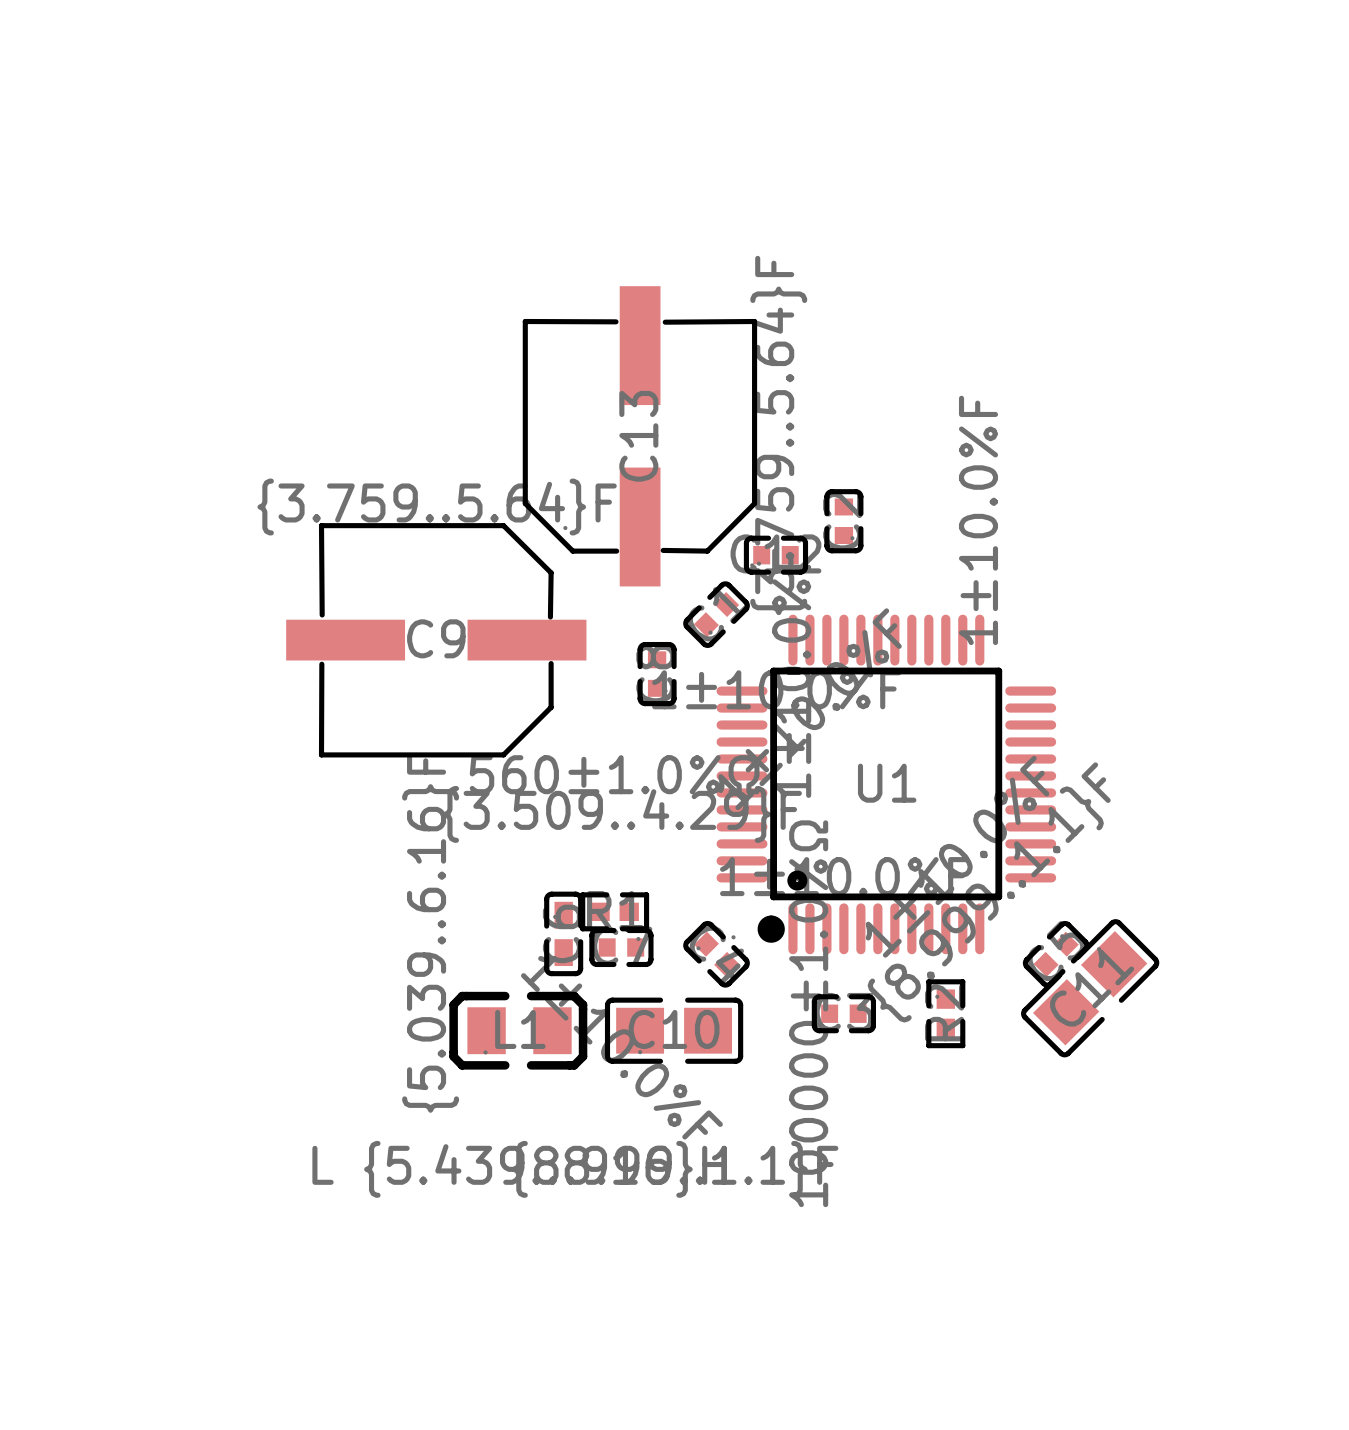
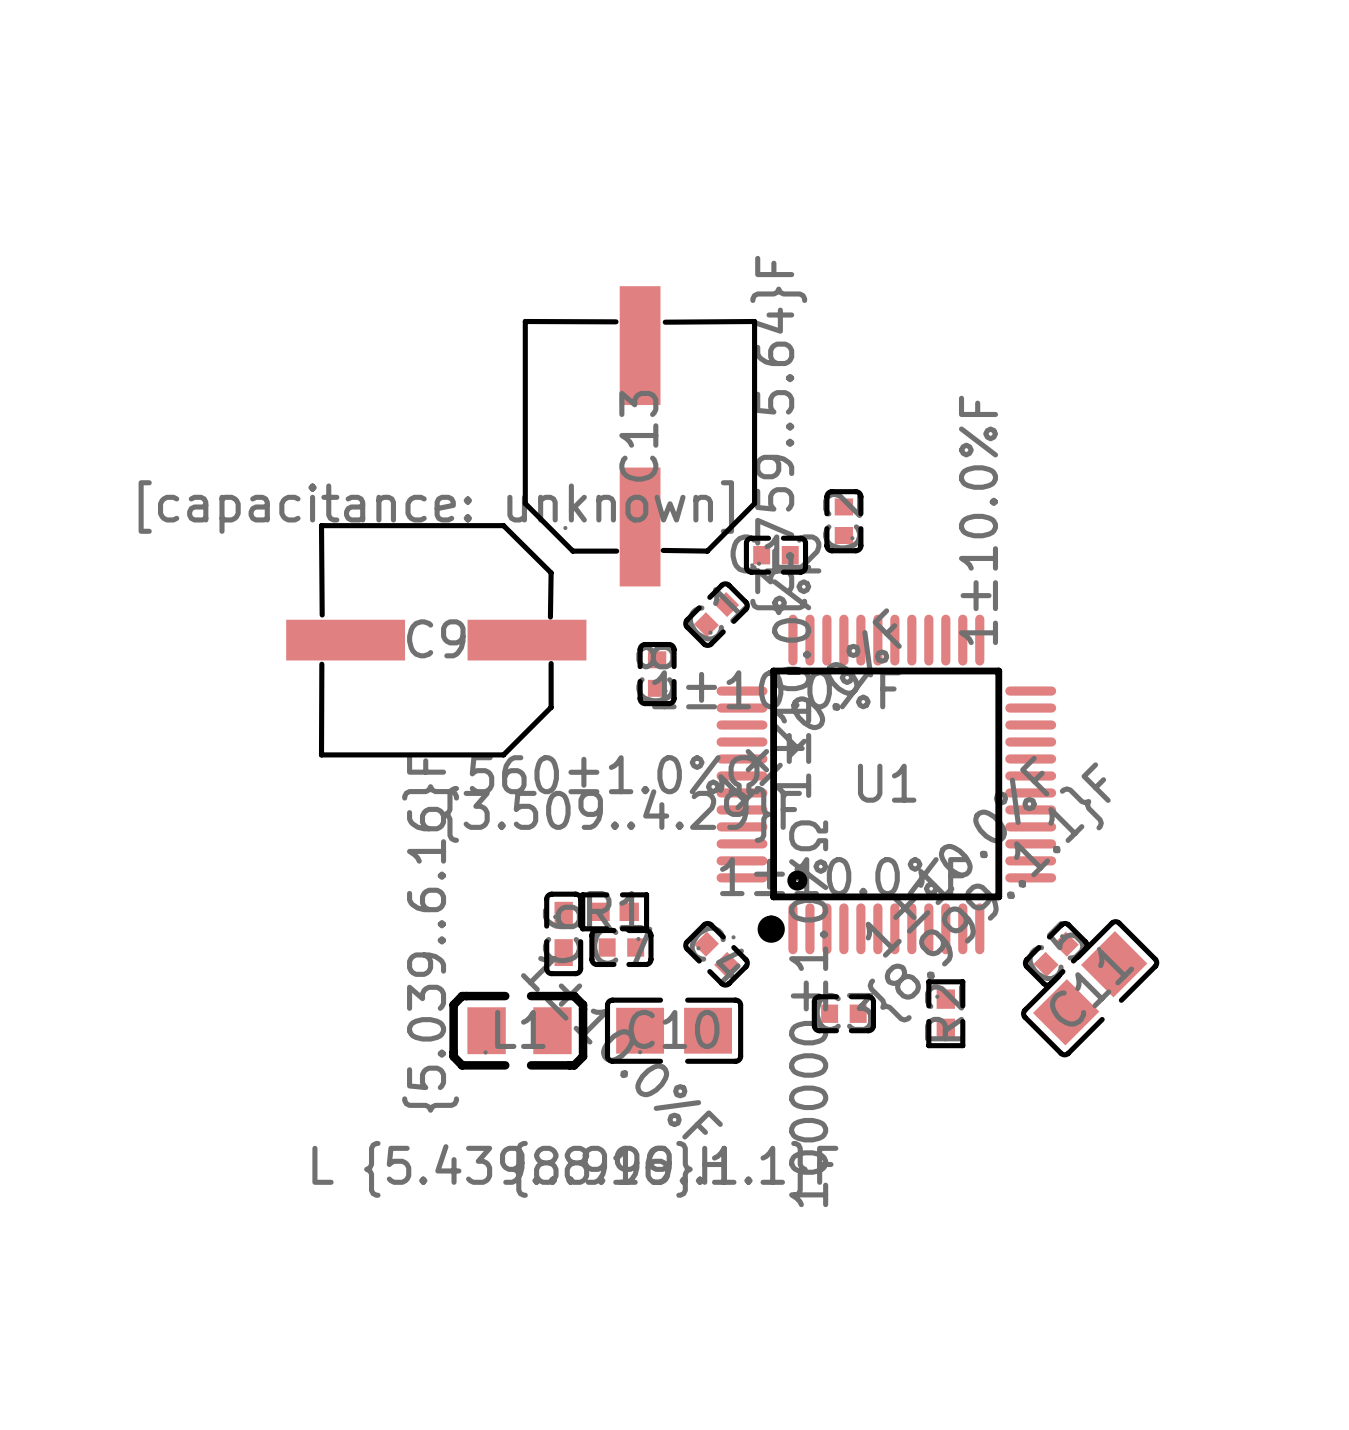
C9 value: {3.759..5.64}F (437, 507) -> [capacitance: unknown] (436, 507)

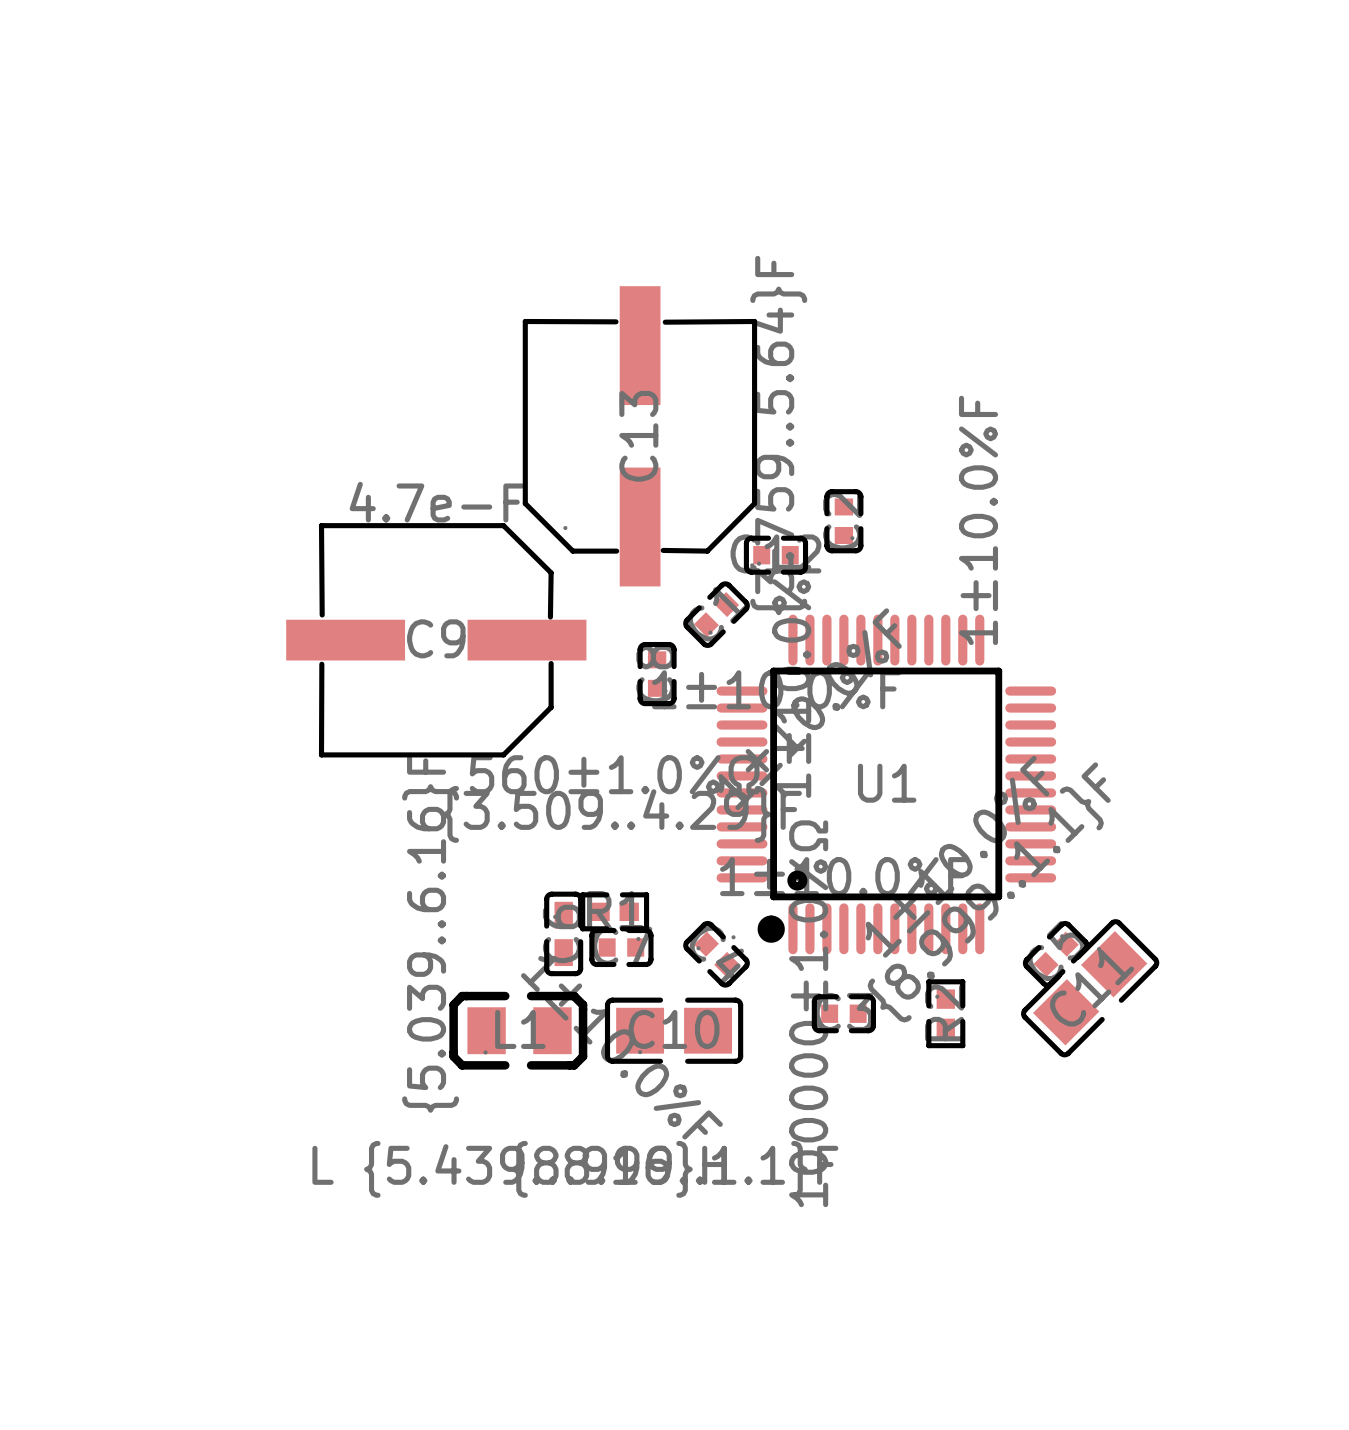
C9 value: [capacitance: unknown] (436, 507) -> 4.7e-F (437, 502)

